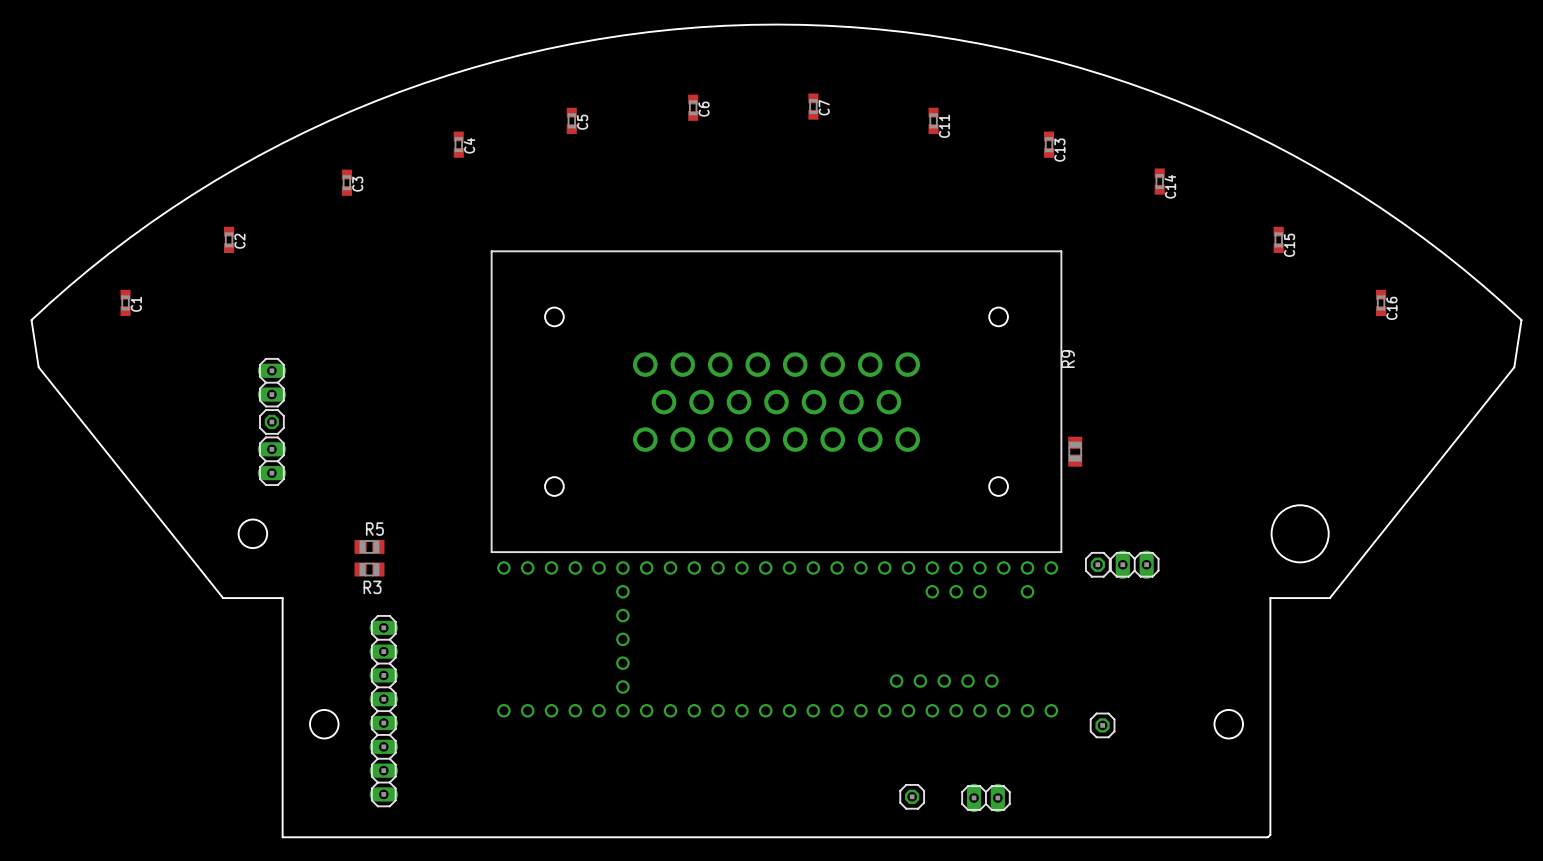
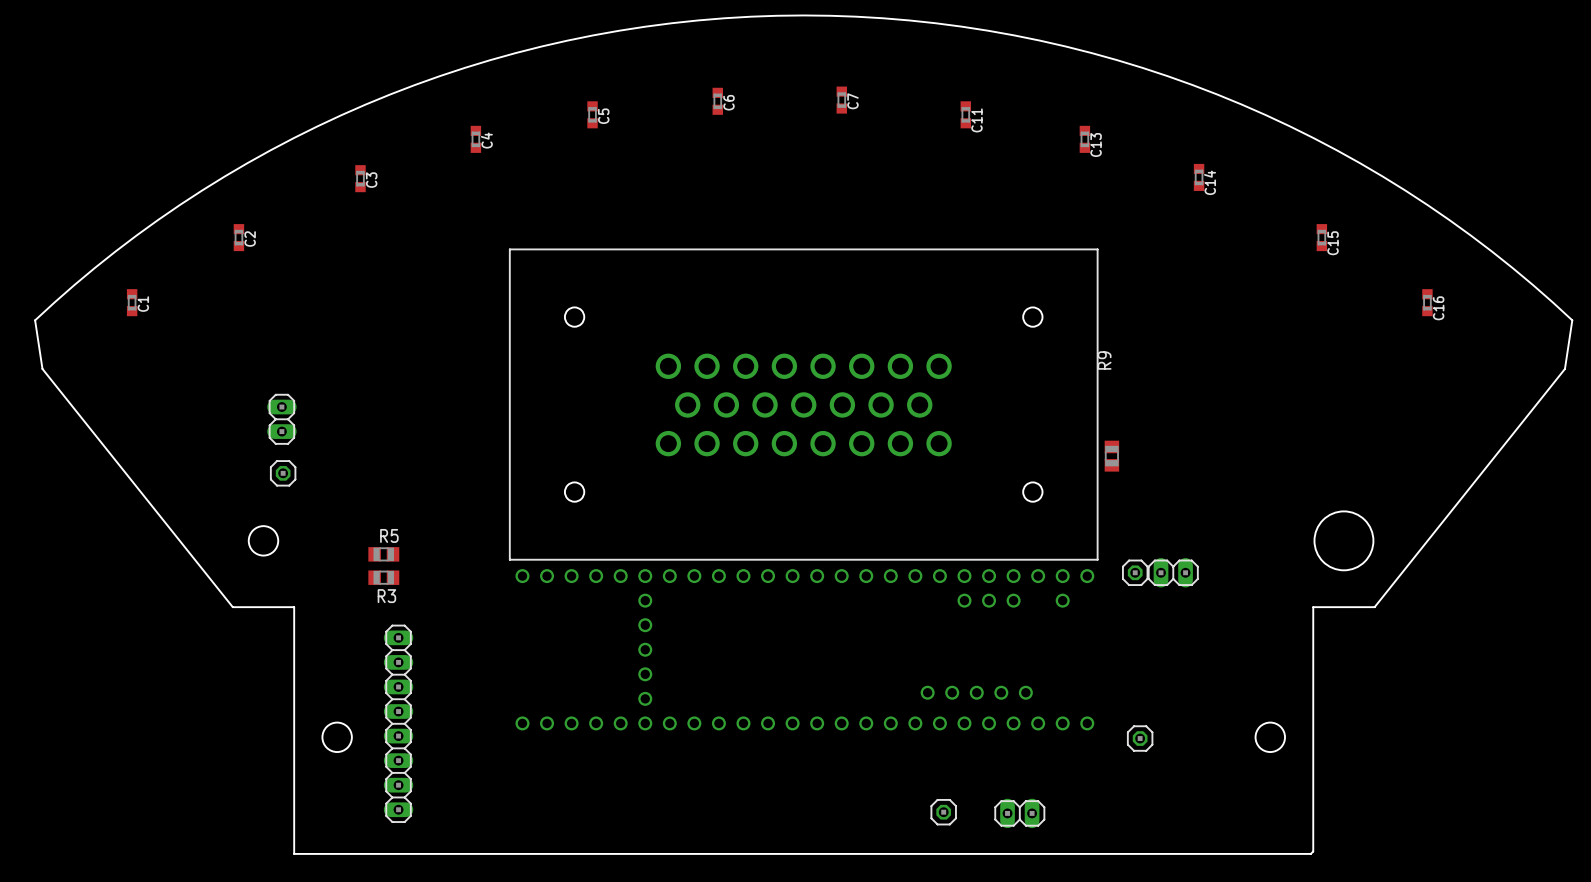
part: (271, 382) -> none
part footprint: [259, 409, 285, 435] -> [267, 394, 297, 445]
part footprint: [257, 436, 287, 486] -> [270, 460, 297, 487]

